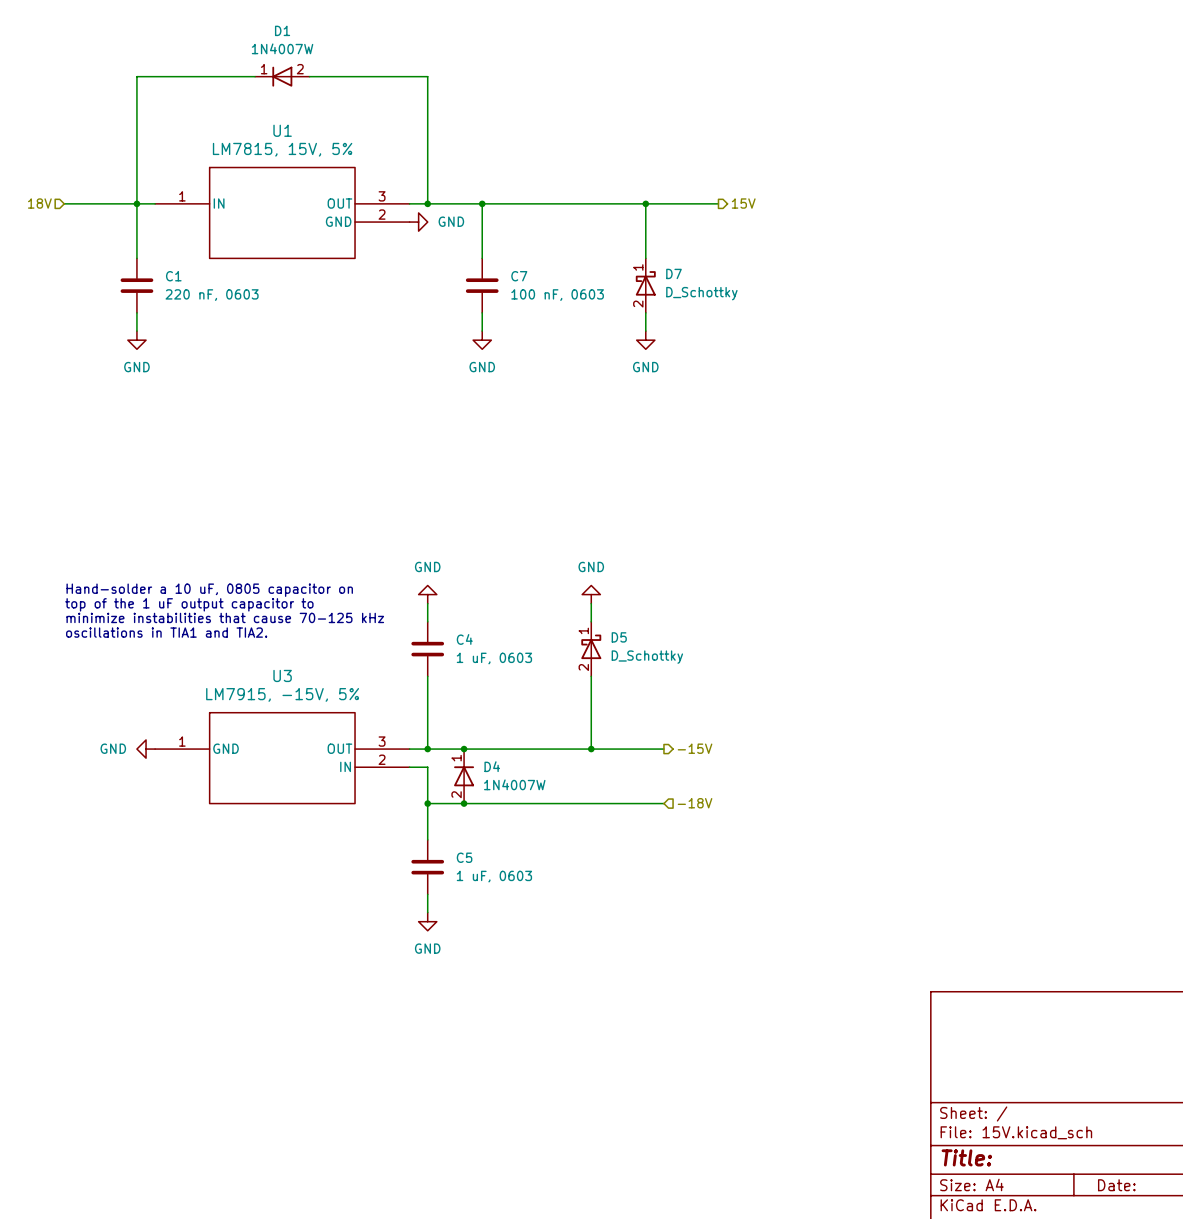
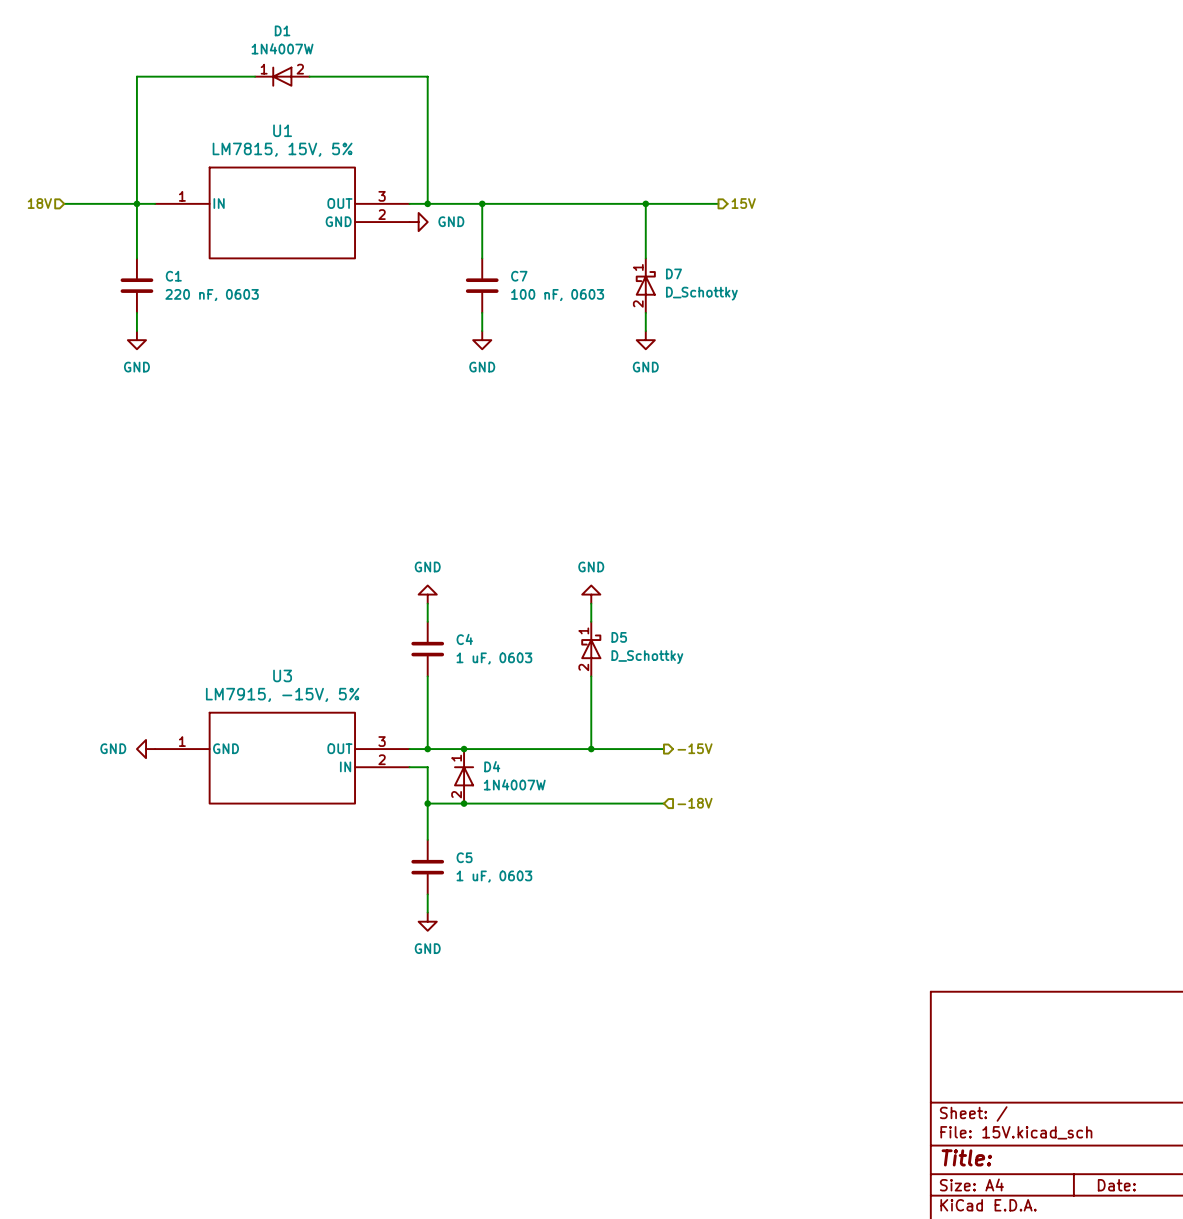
text: Hand-solder a 10 uF, 0805 capacitor on (209, 590) -> none
text: top of the 1 uF output capacitor to (189, 604) -> none
text: minimize instabilities that cause 70-125 kHz (225, 617) -> none
text: oscillations in TIA1 and TIA2. (166, 632) -> none

